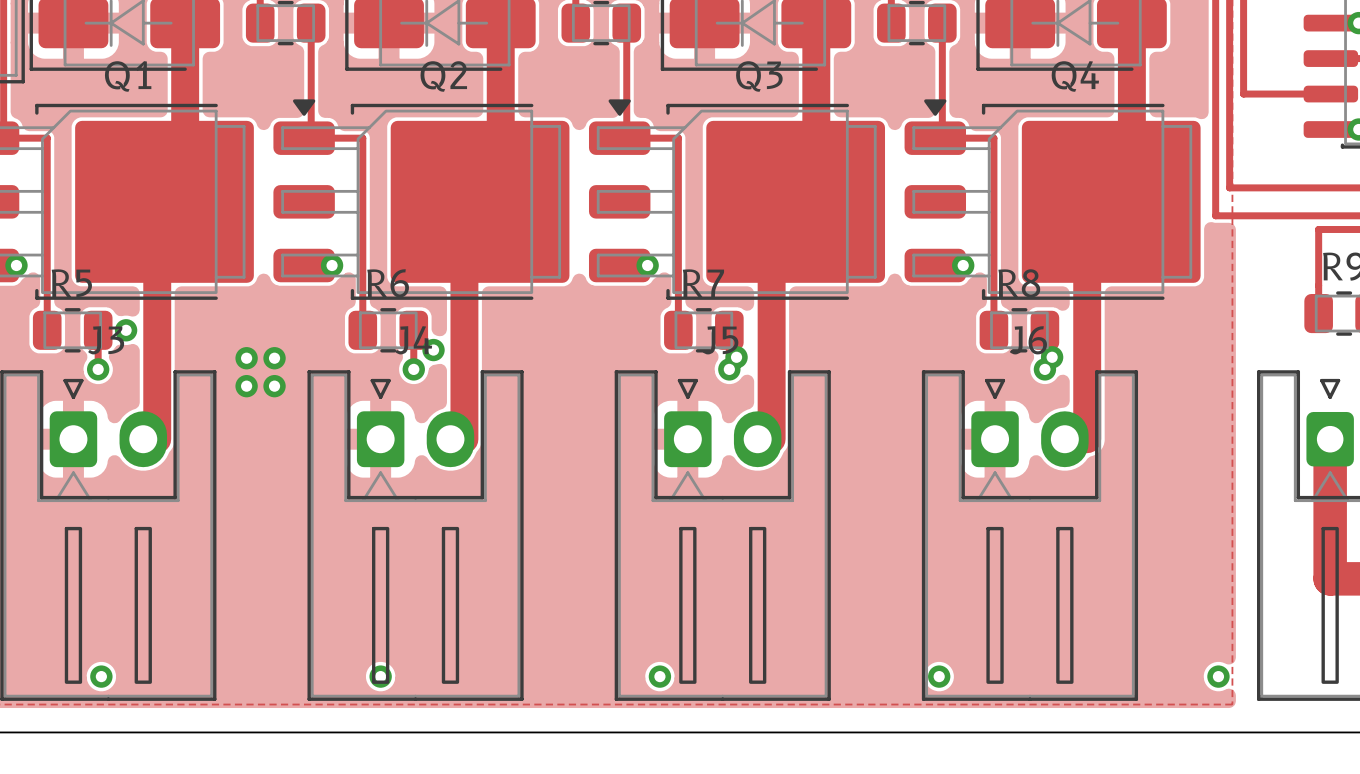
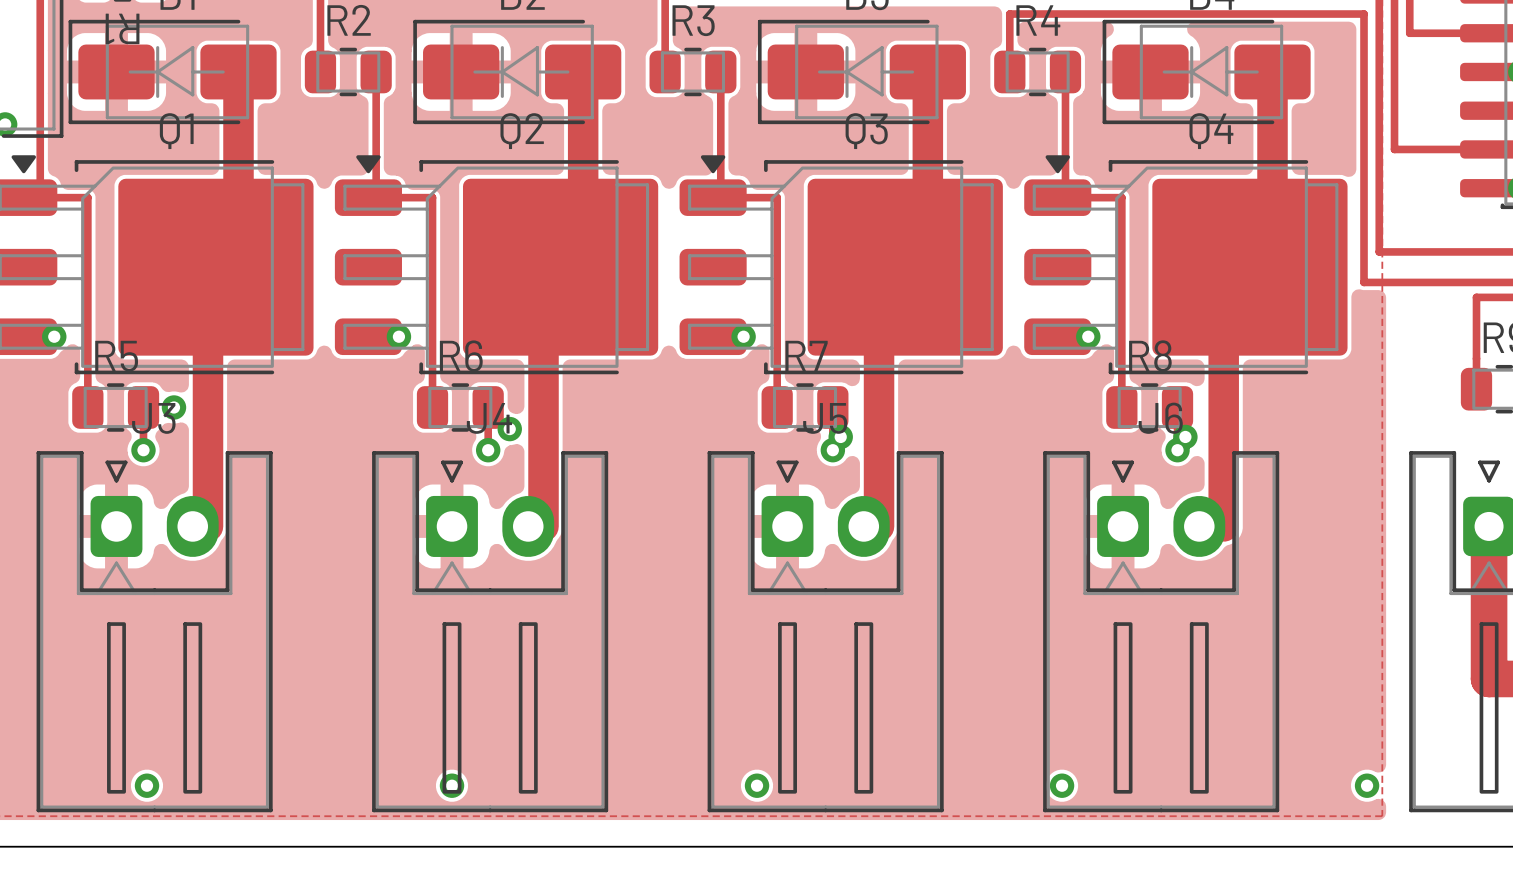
via: (246, 358) -> none
via: (274, 358) -> none
via: (246, 386) -> none
via: (274, 386) -> none

